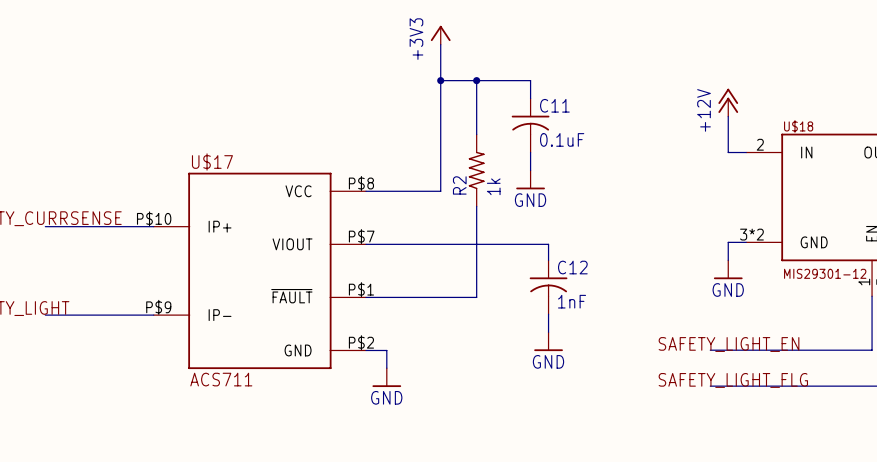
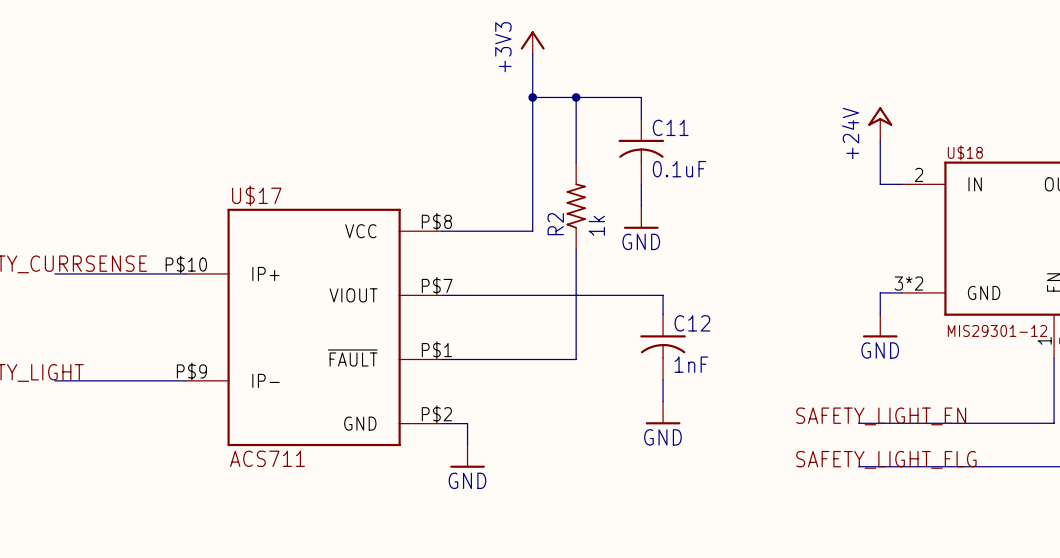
power symbol: +12V (728, 102) -> +24V (880, 124)

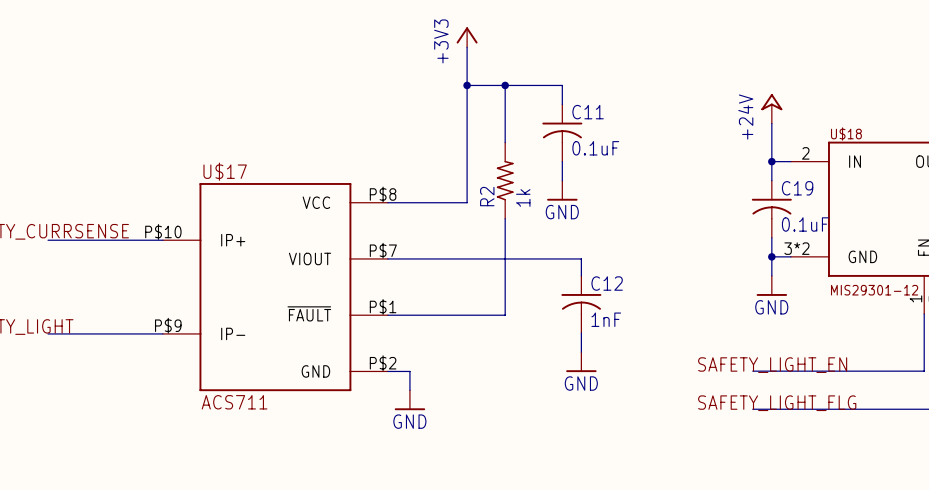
wire: none -> (771, 161) (771, 180)
junction: none -> (771, 161)
C19: none -> 0.1uF (771, 209)
wire: none -> (771, 237) (771, 256)
junction: none -> (771, 256)

